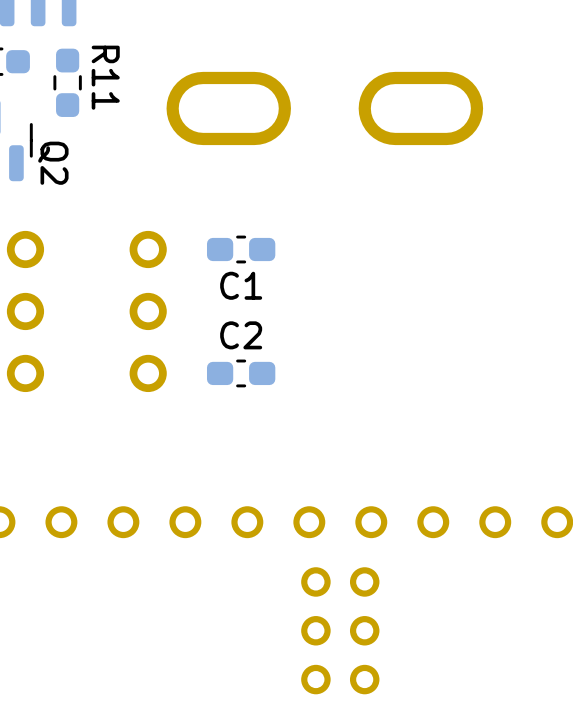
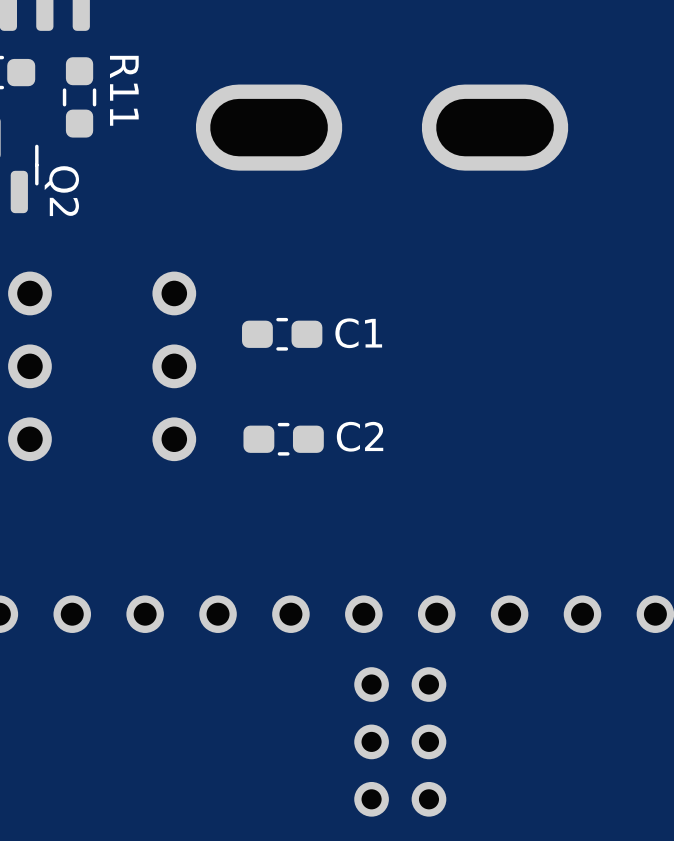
C1 position: (241, 249) -> (282, 334)
C1 name position: C1 (241, 285) -> C1 (358, 333)
C2 name position: C2 (241, 335) -> C2 (360, 436)

